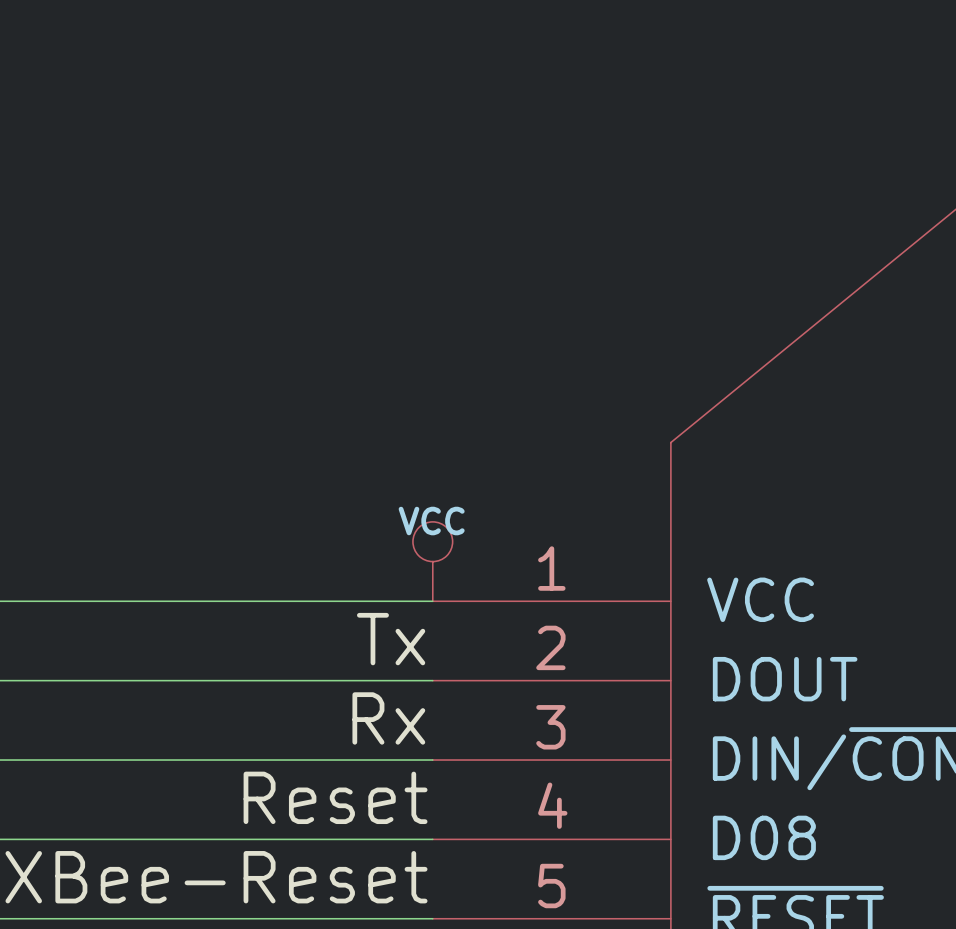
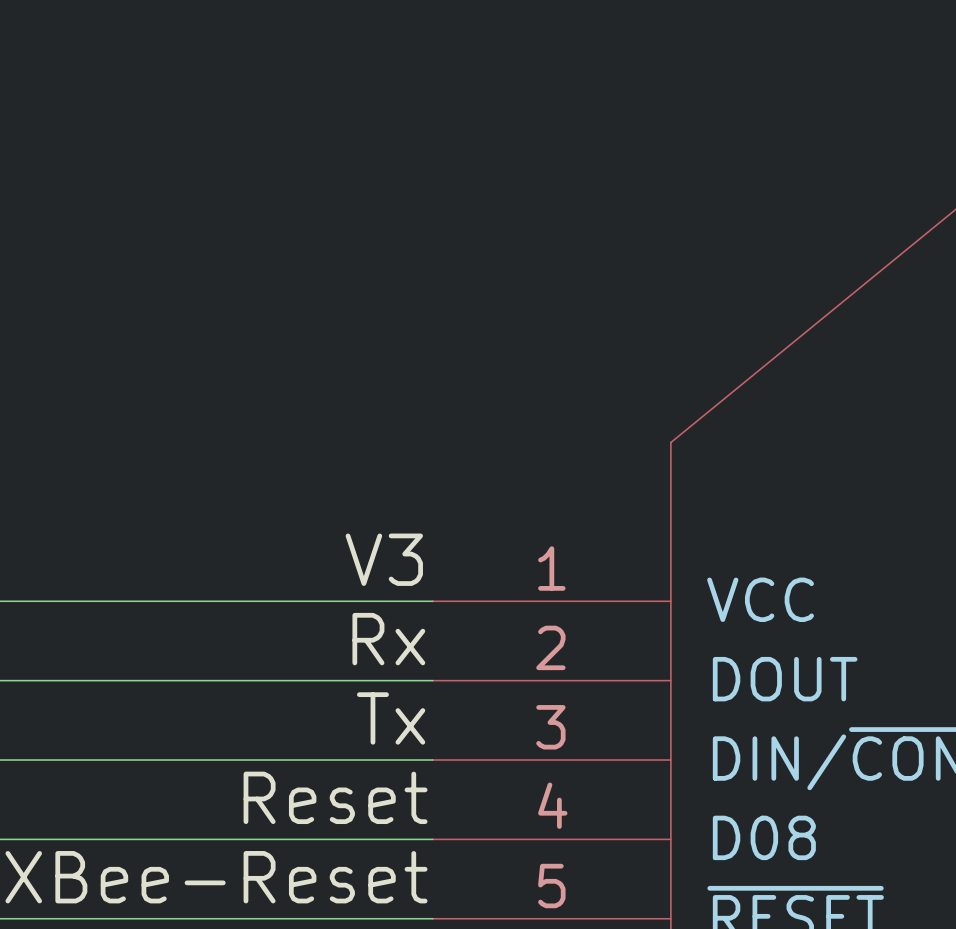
label: none -> V3 (384, 559)
power symbol: VCC (432, 561) -> none
label: Tx (391, 639) -> Rx (388, 639)
label: Rx (388, 718) -> Tx (391, 718)

